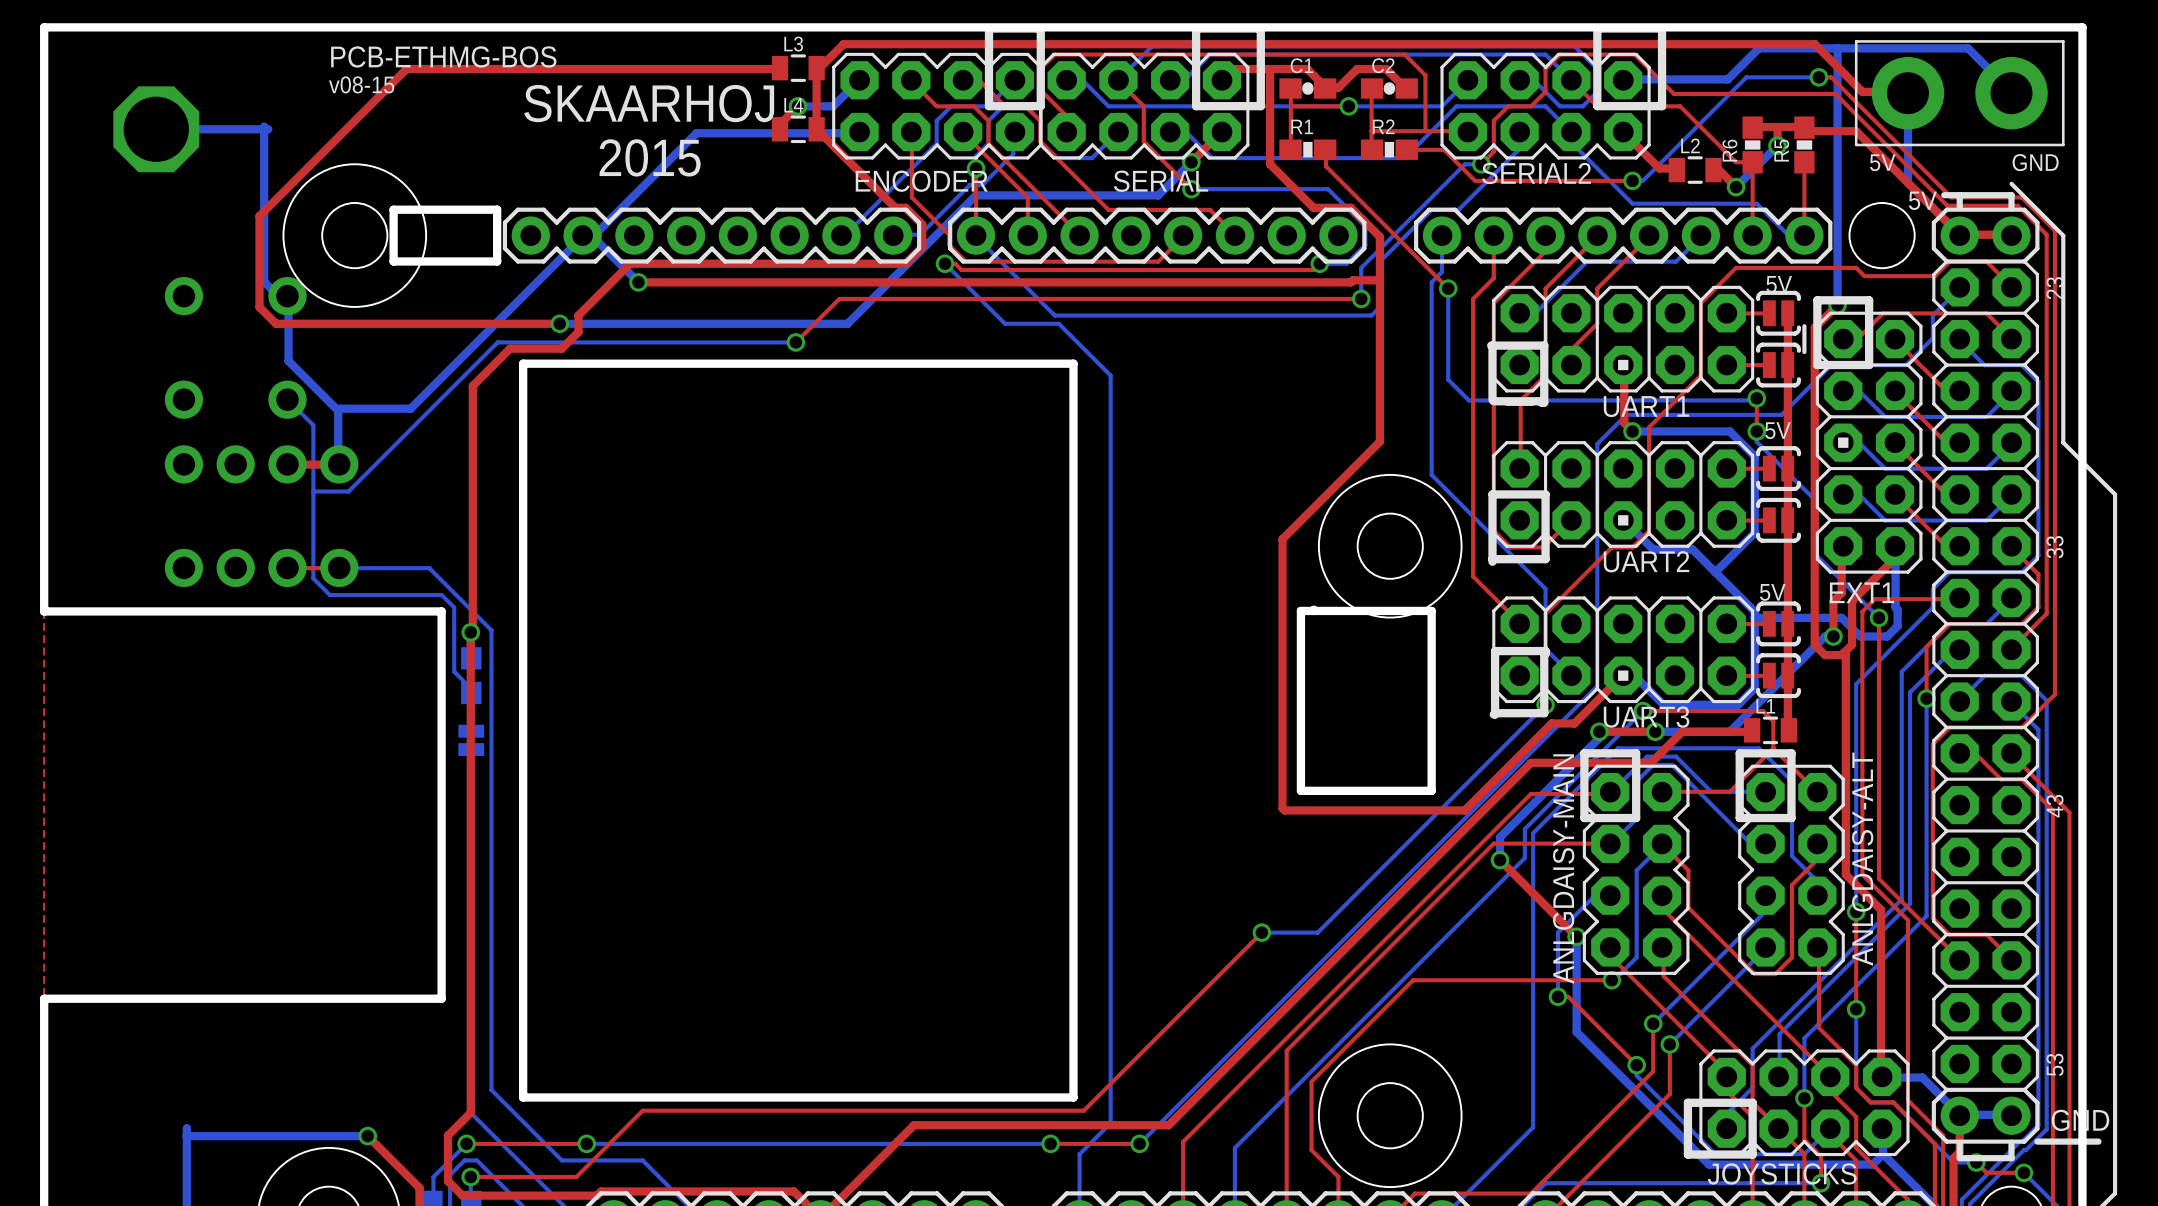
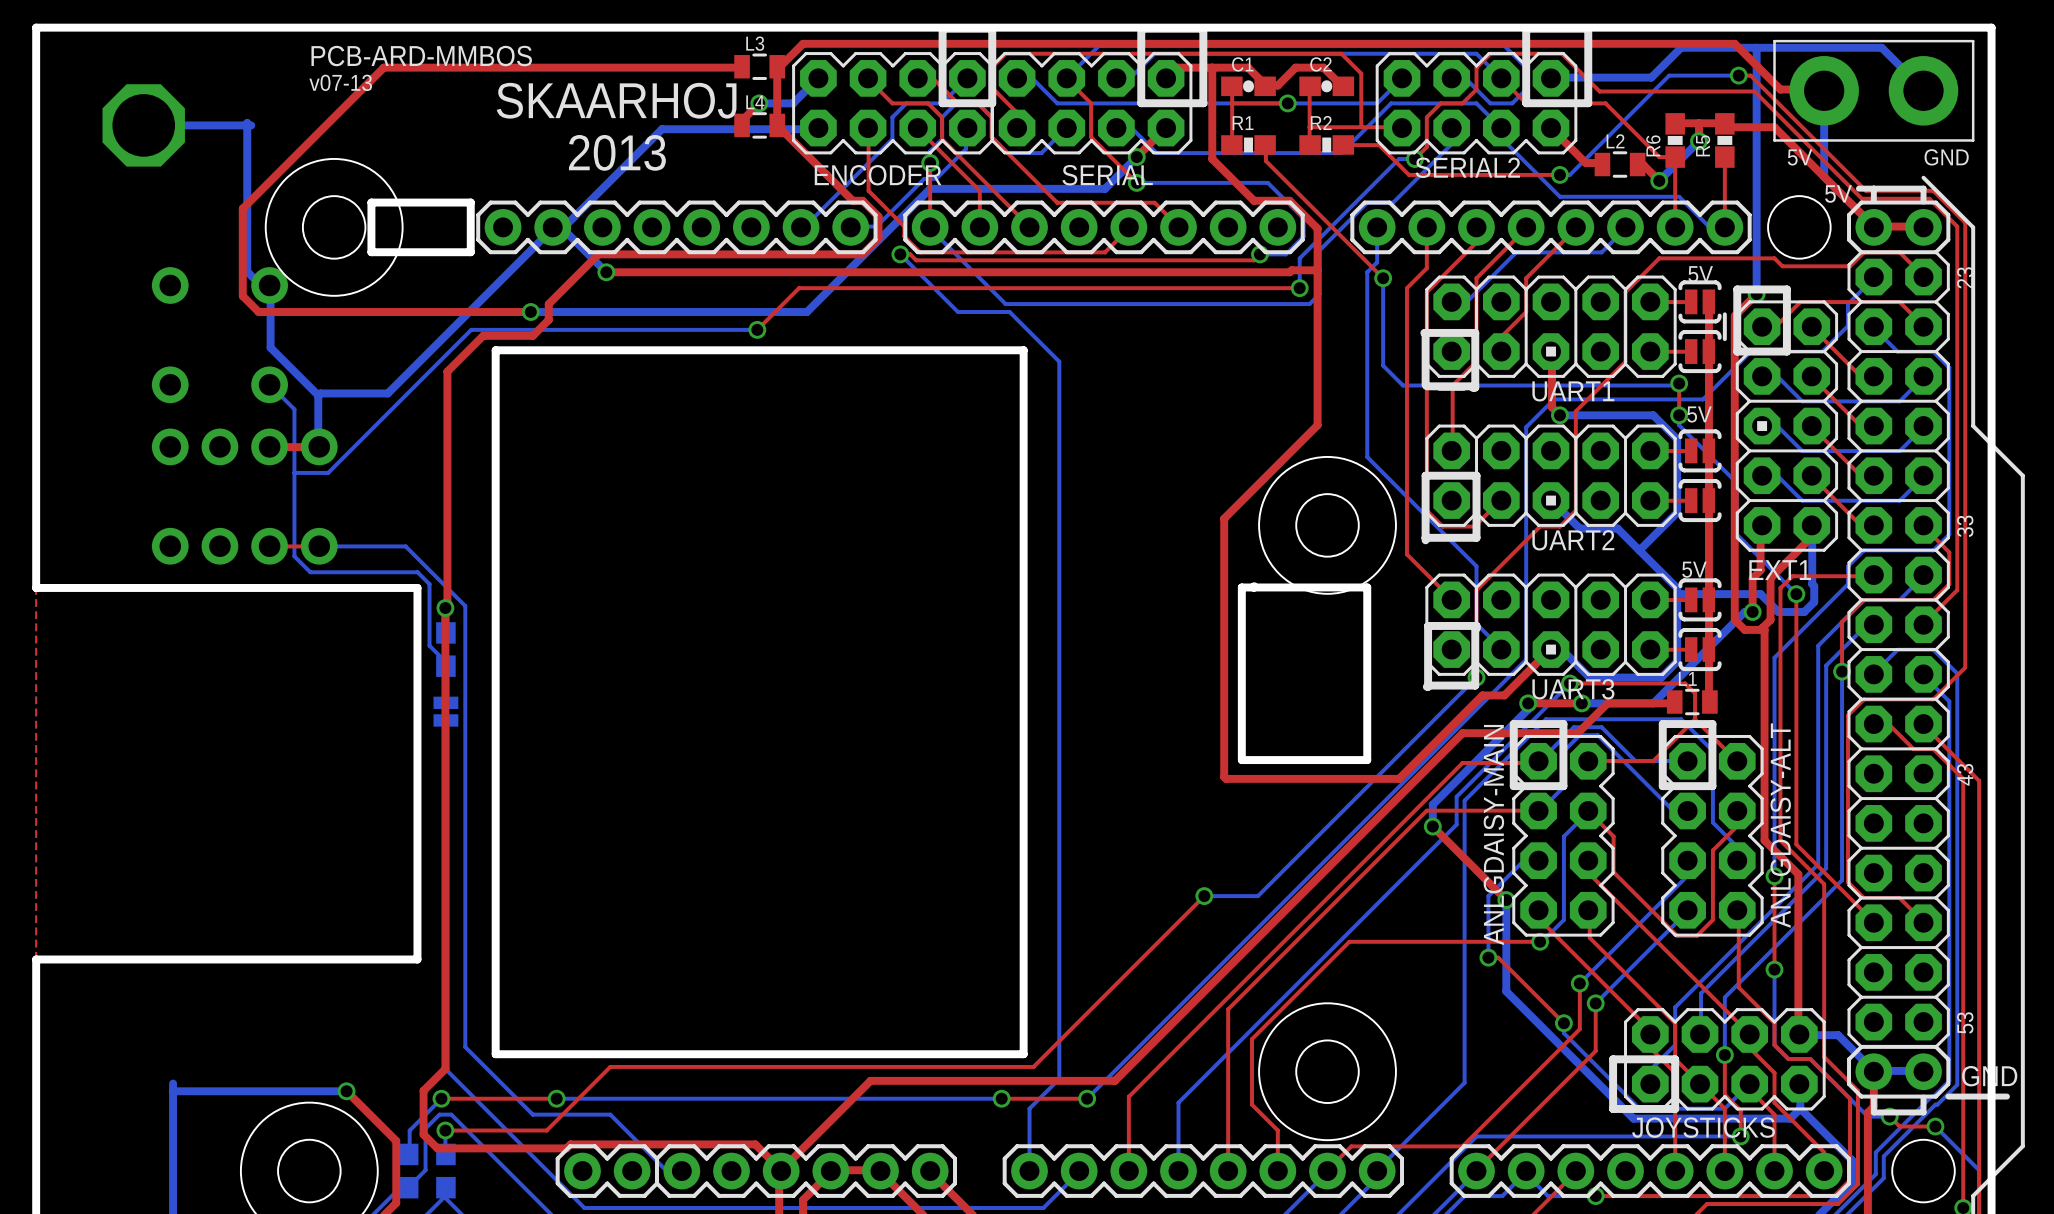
text: PCB-ETHMG-BOS (443, 56) -> PCB-ARD-MMBOS (421, 56)
text: v08-15 (361, 84) -> v07-13 (340, 82)
text: 2015 (650, 157) -> 2013 (617, 152)

